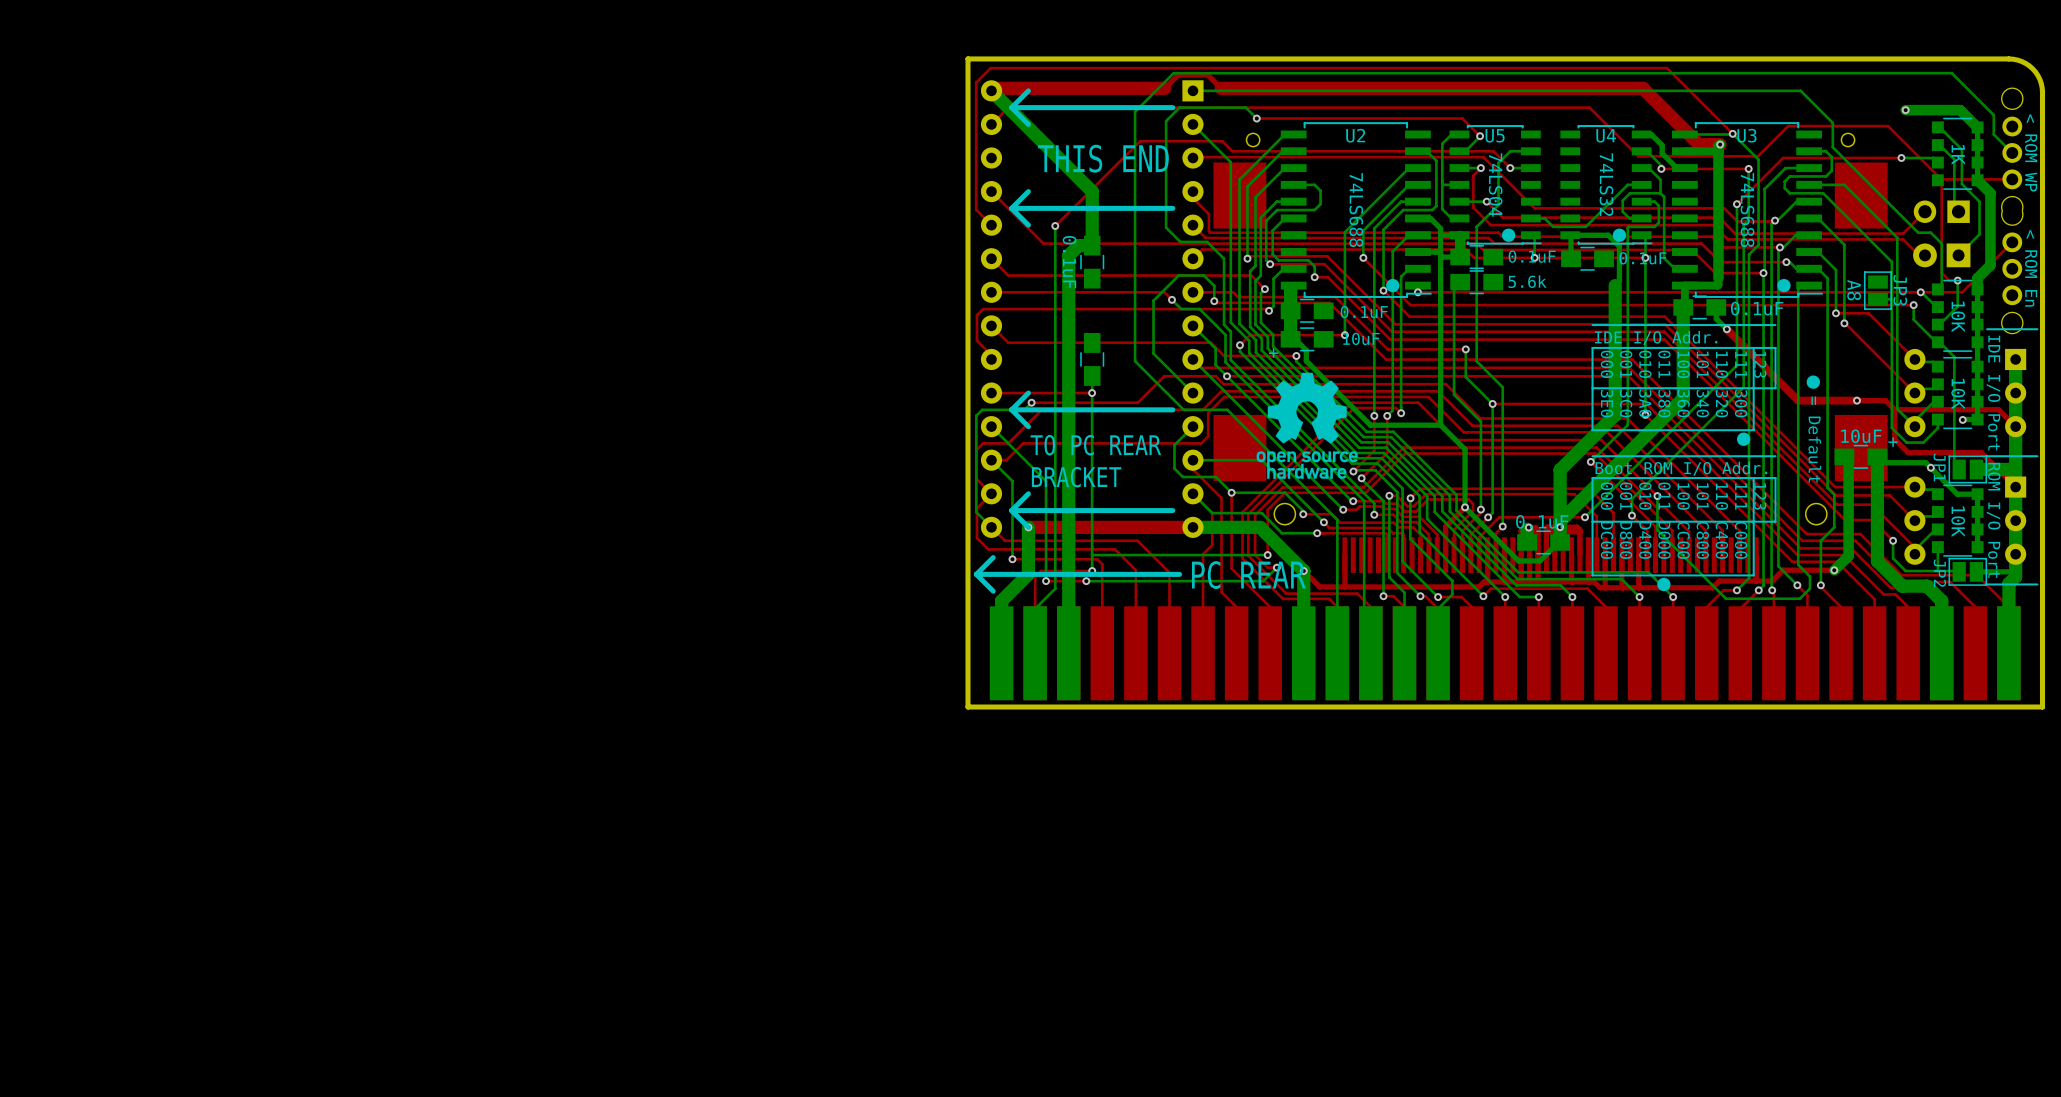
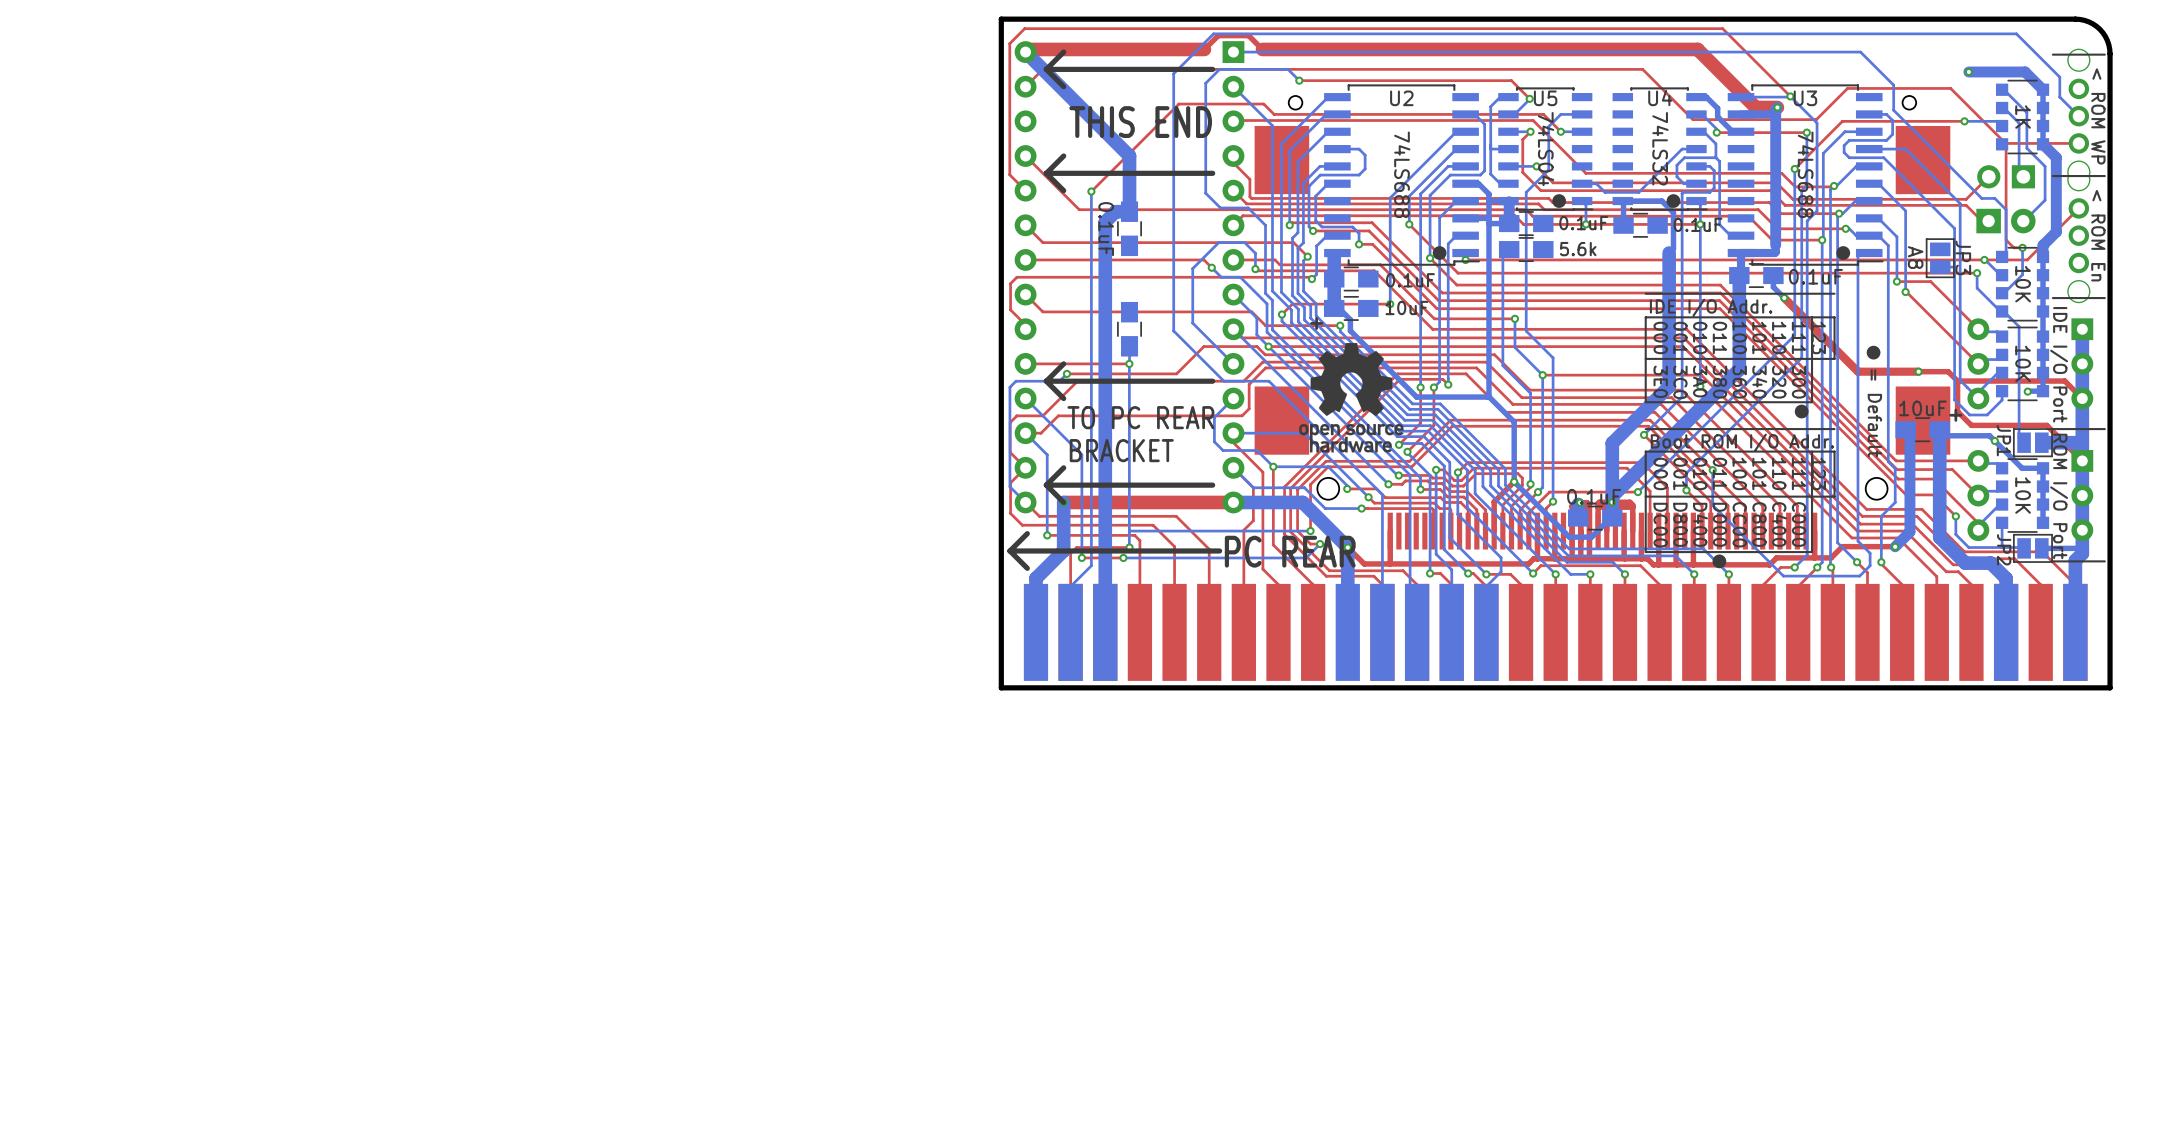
line: none -> (2104, 54) (2052, 54)
line: none -> (2104, 176) (2052, 176)
part rotation: 0° (1941, 255) -> 180° (2005, 221)

